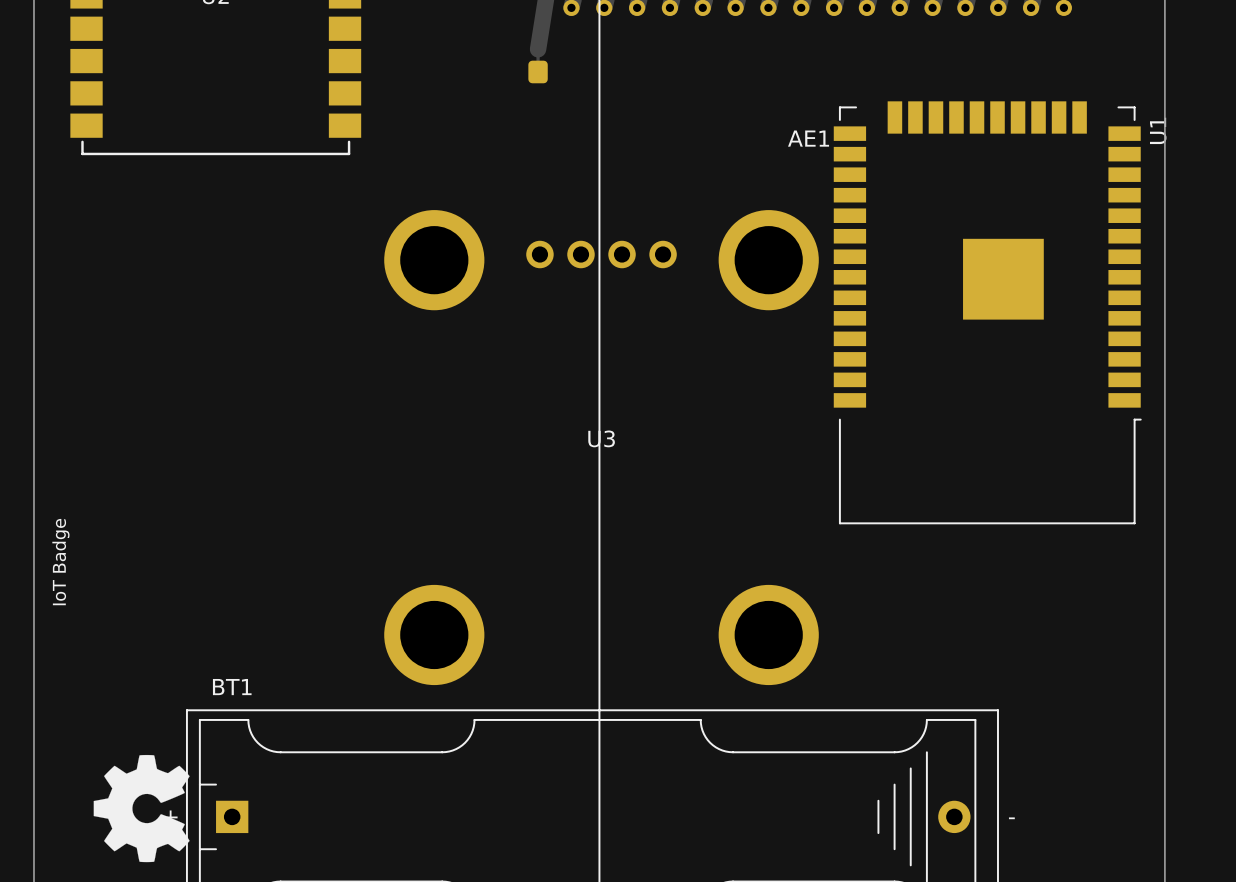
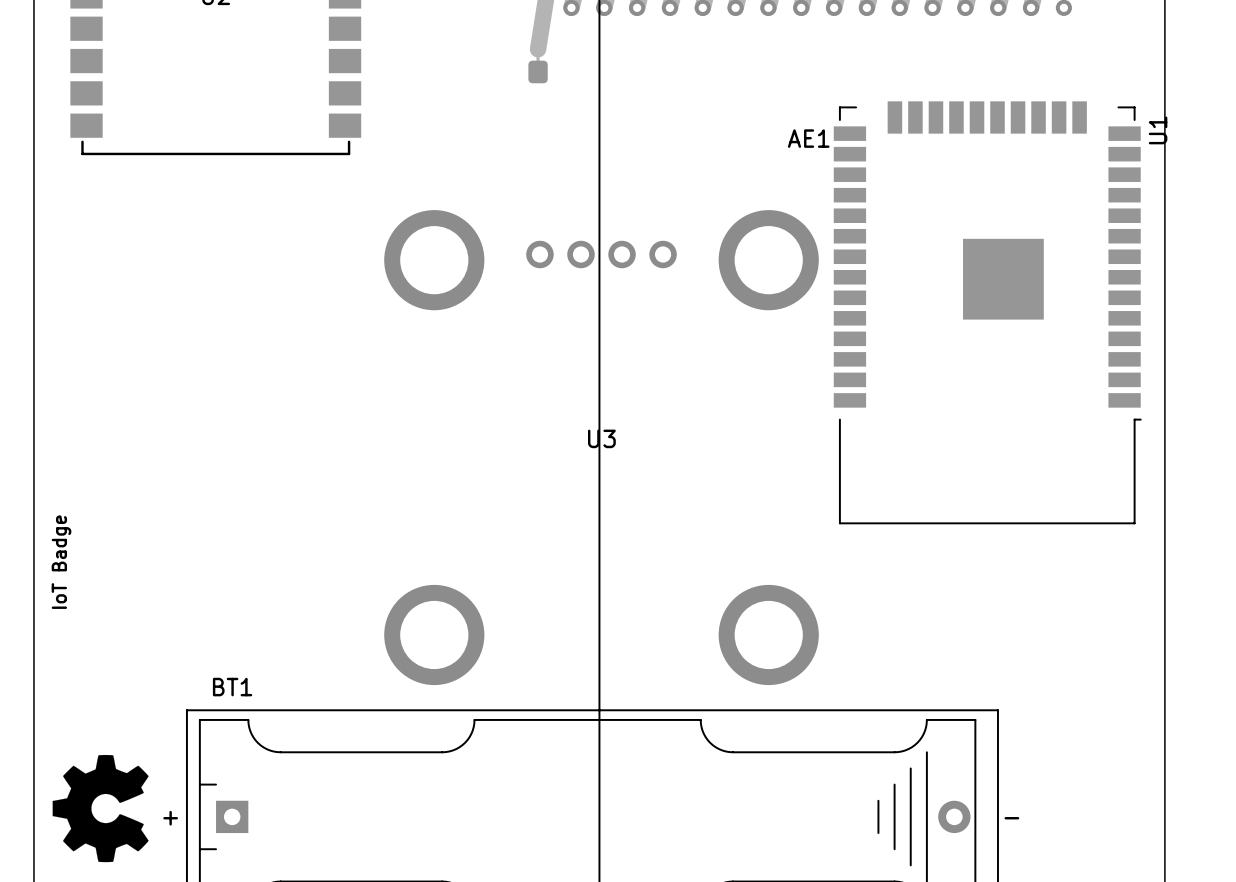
drawing position: (141, 808) -> (100, 808)

